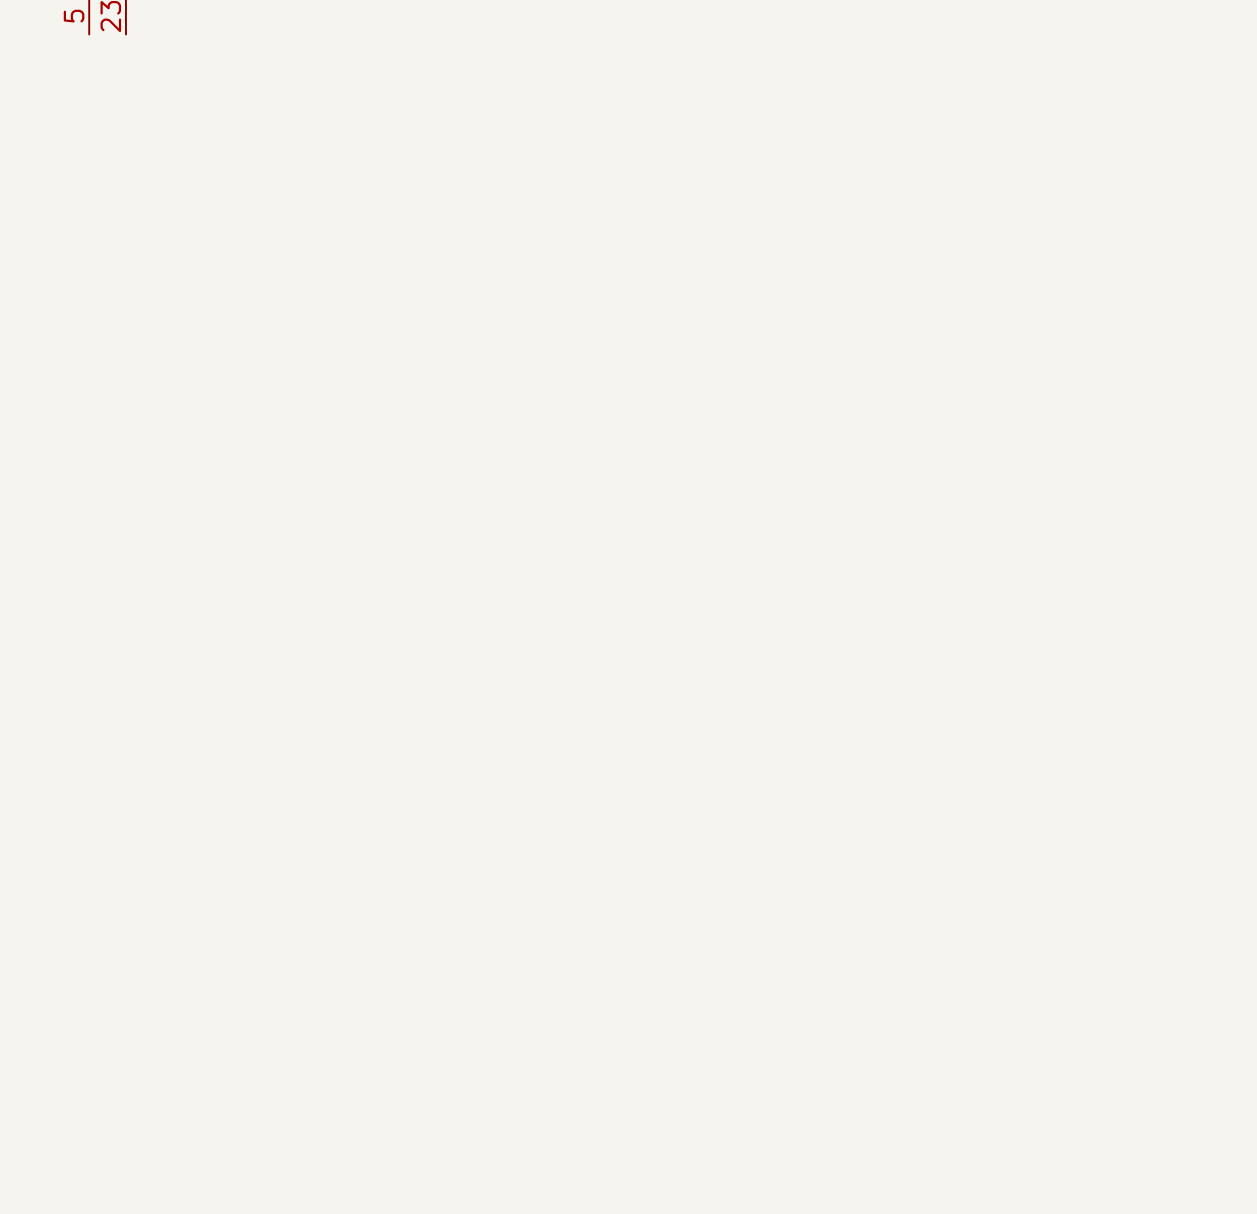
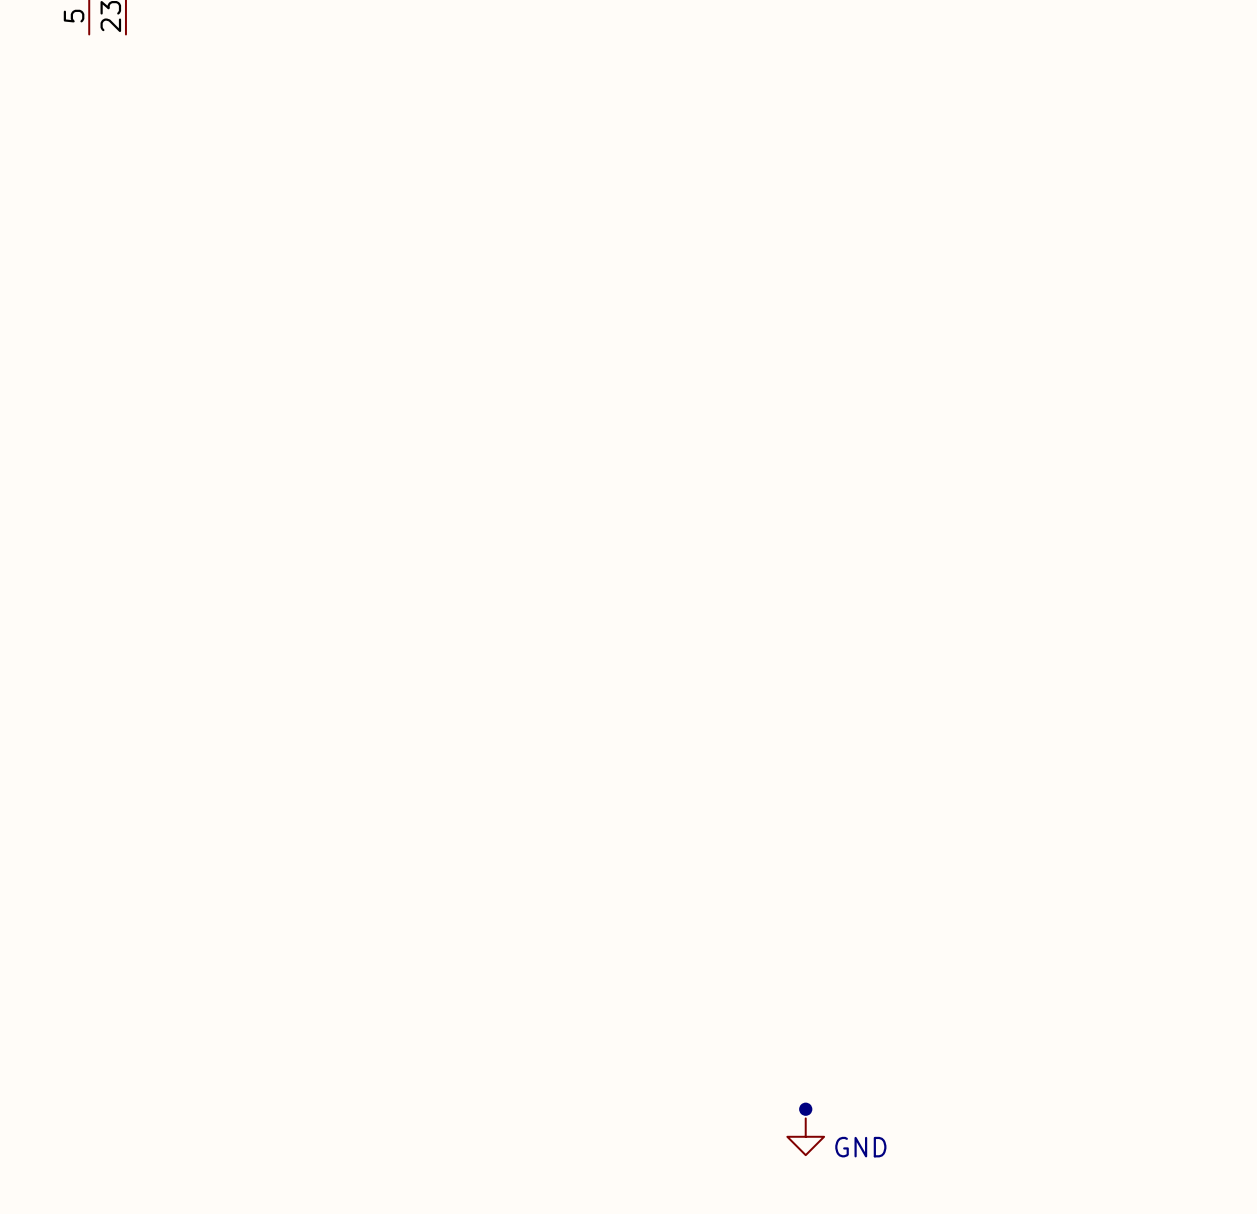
junction: none -> (805, 1109)
power symbol: none -> GND (805, 1136)

